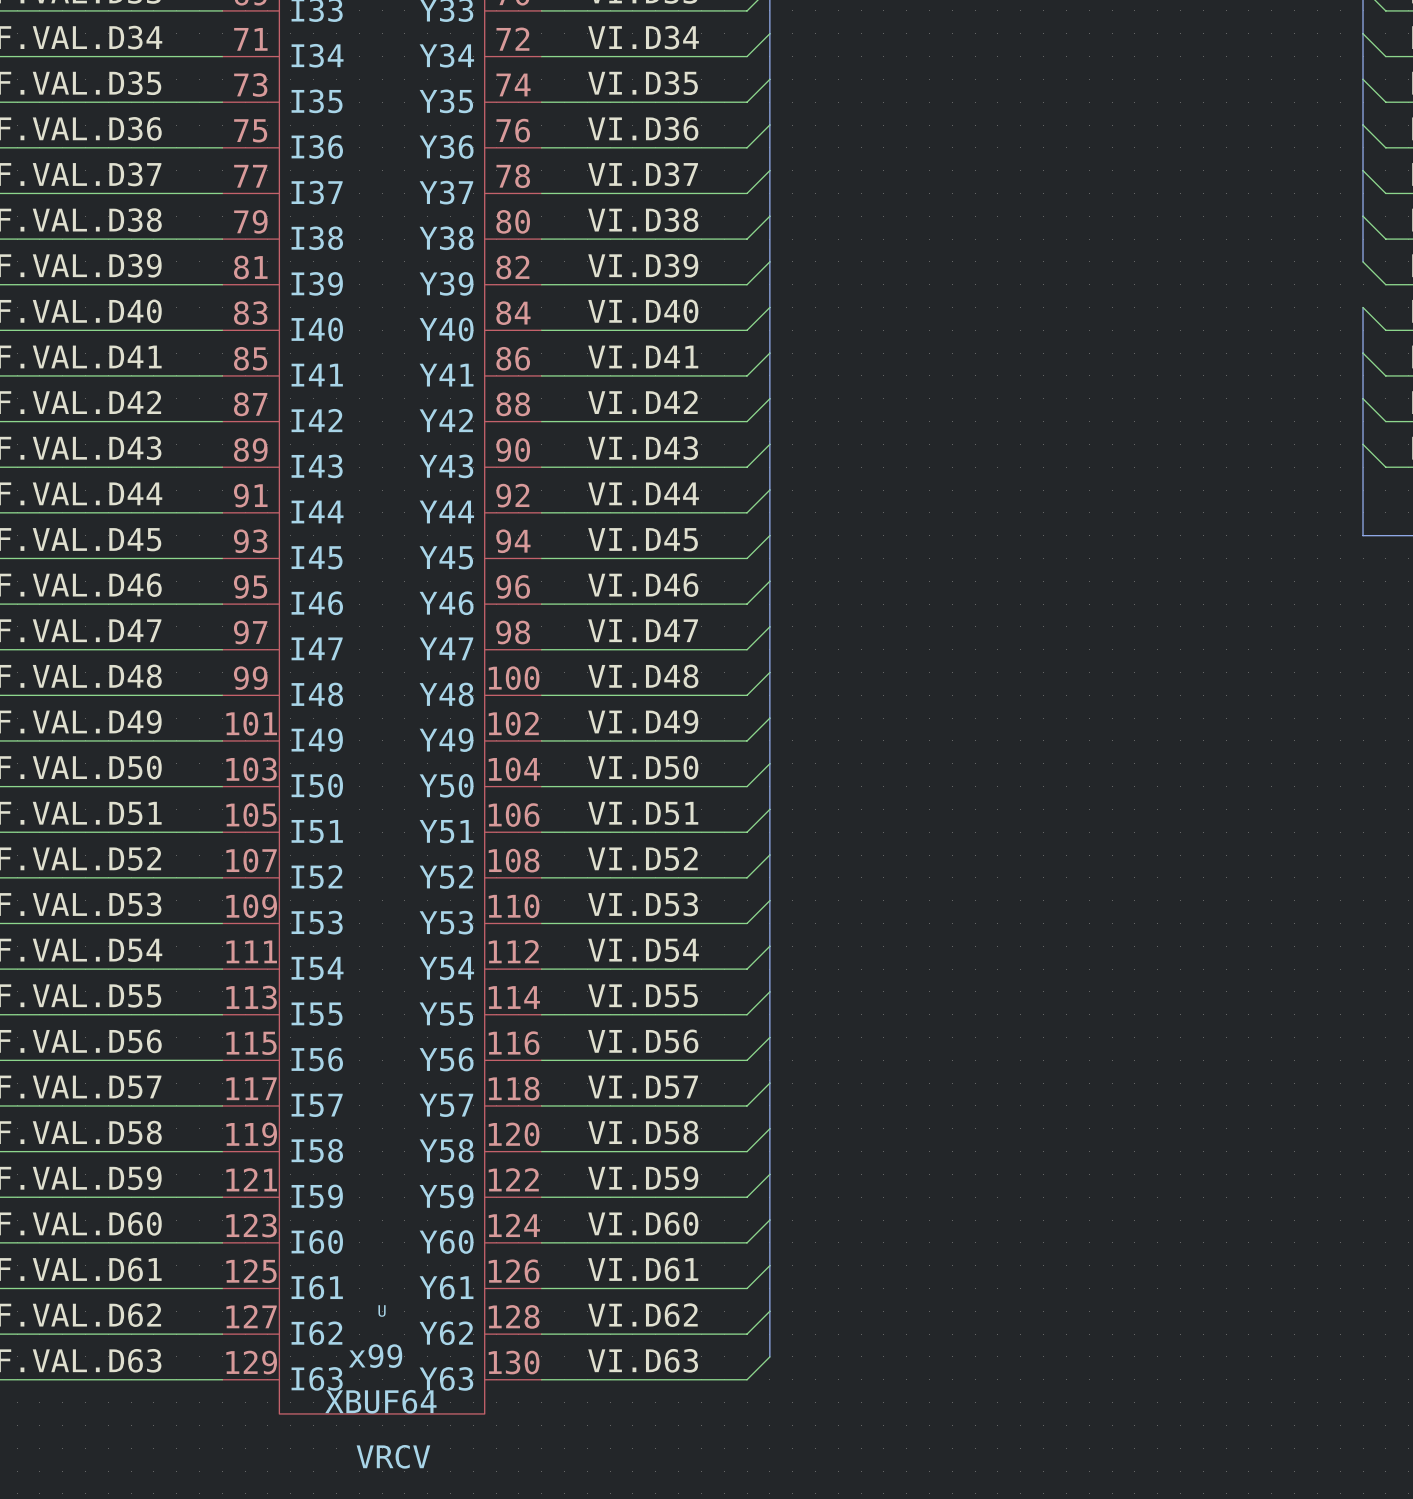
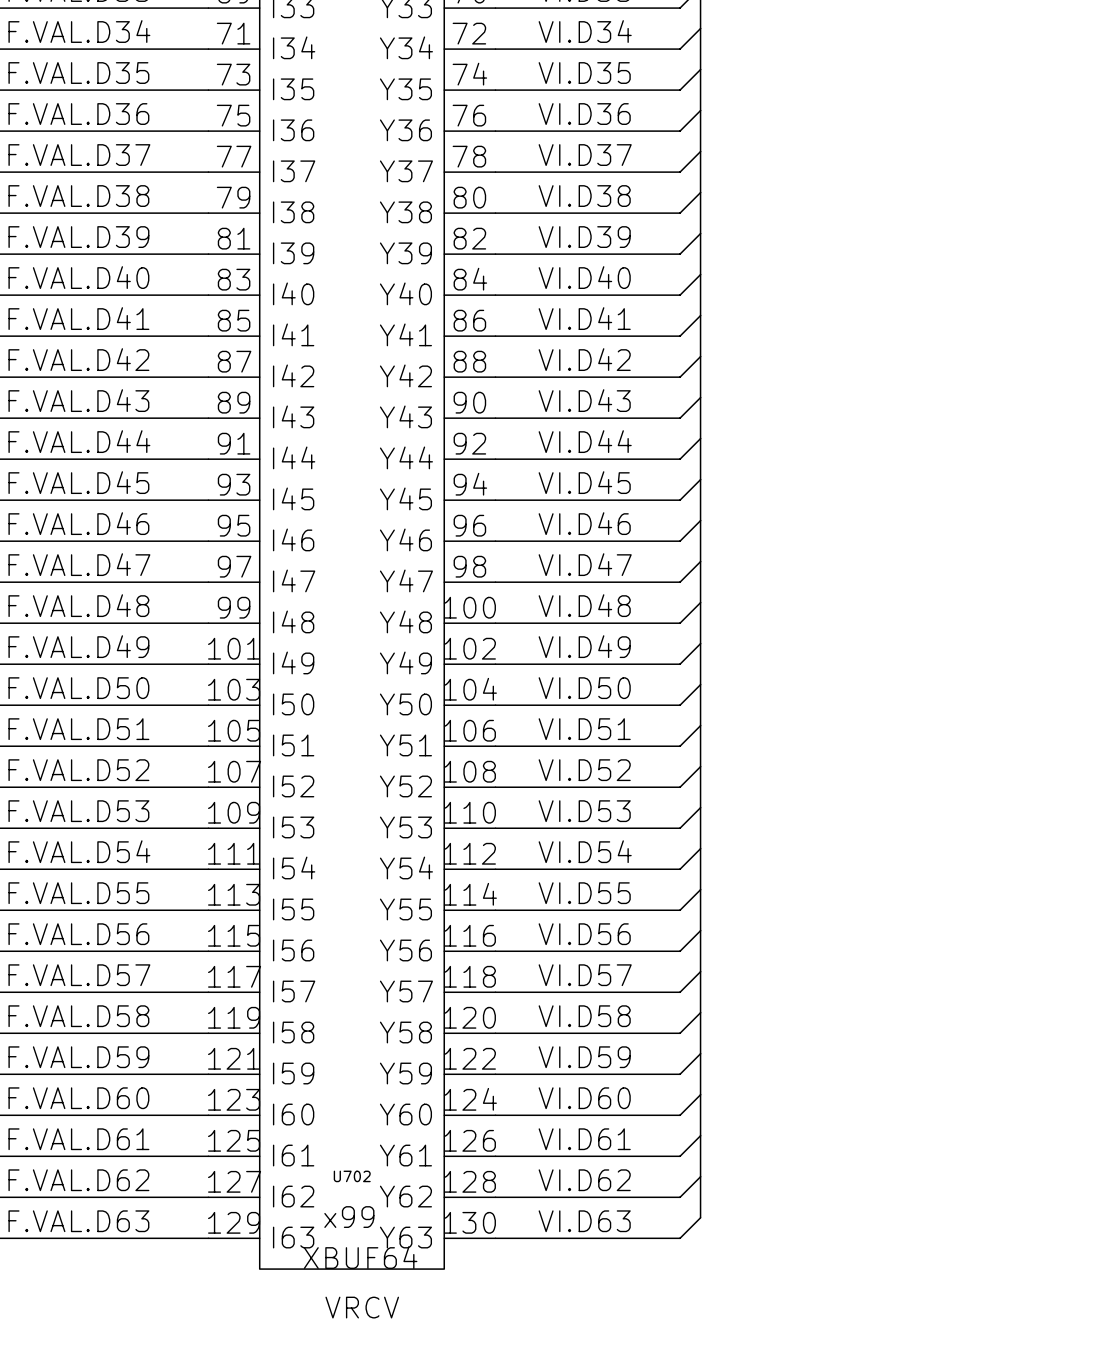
U name: U (382, 1310) -> U702 (352, 1176)

